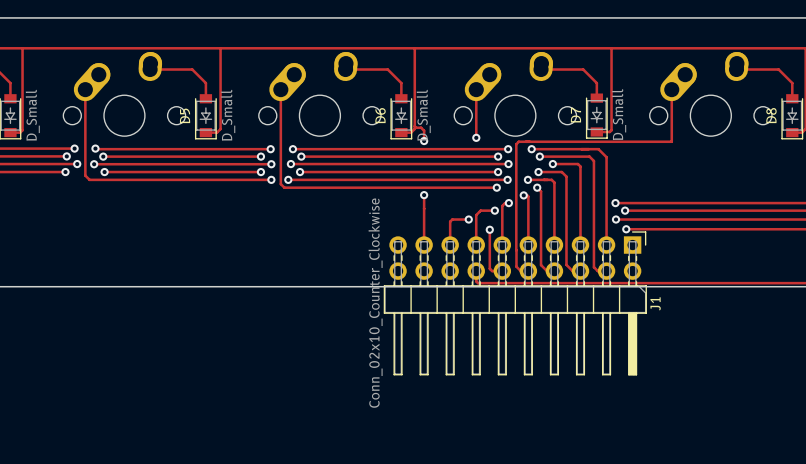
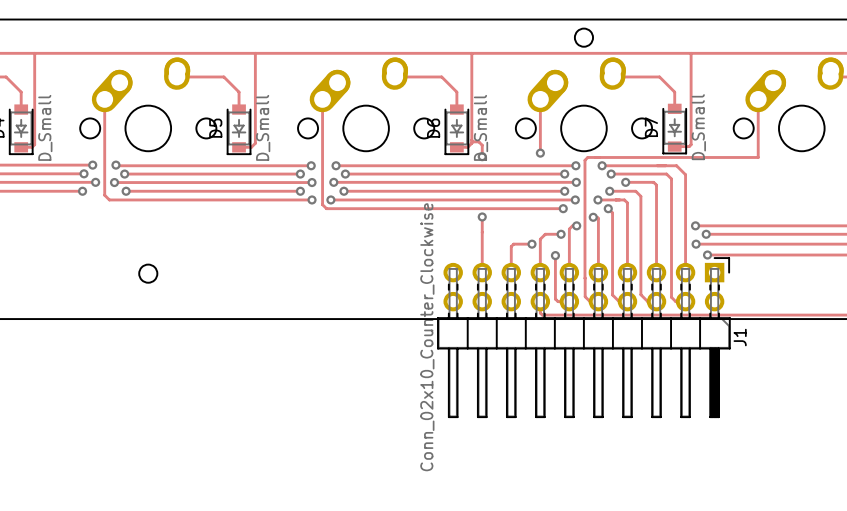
round board edge: none -> [574, 28, 594, 48]
round board edge: none -> [138, 264, 158, 284]

